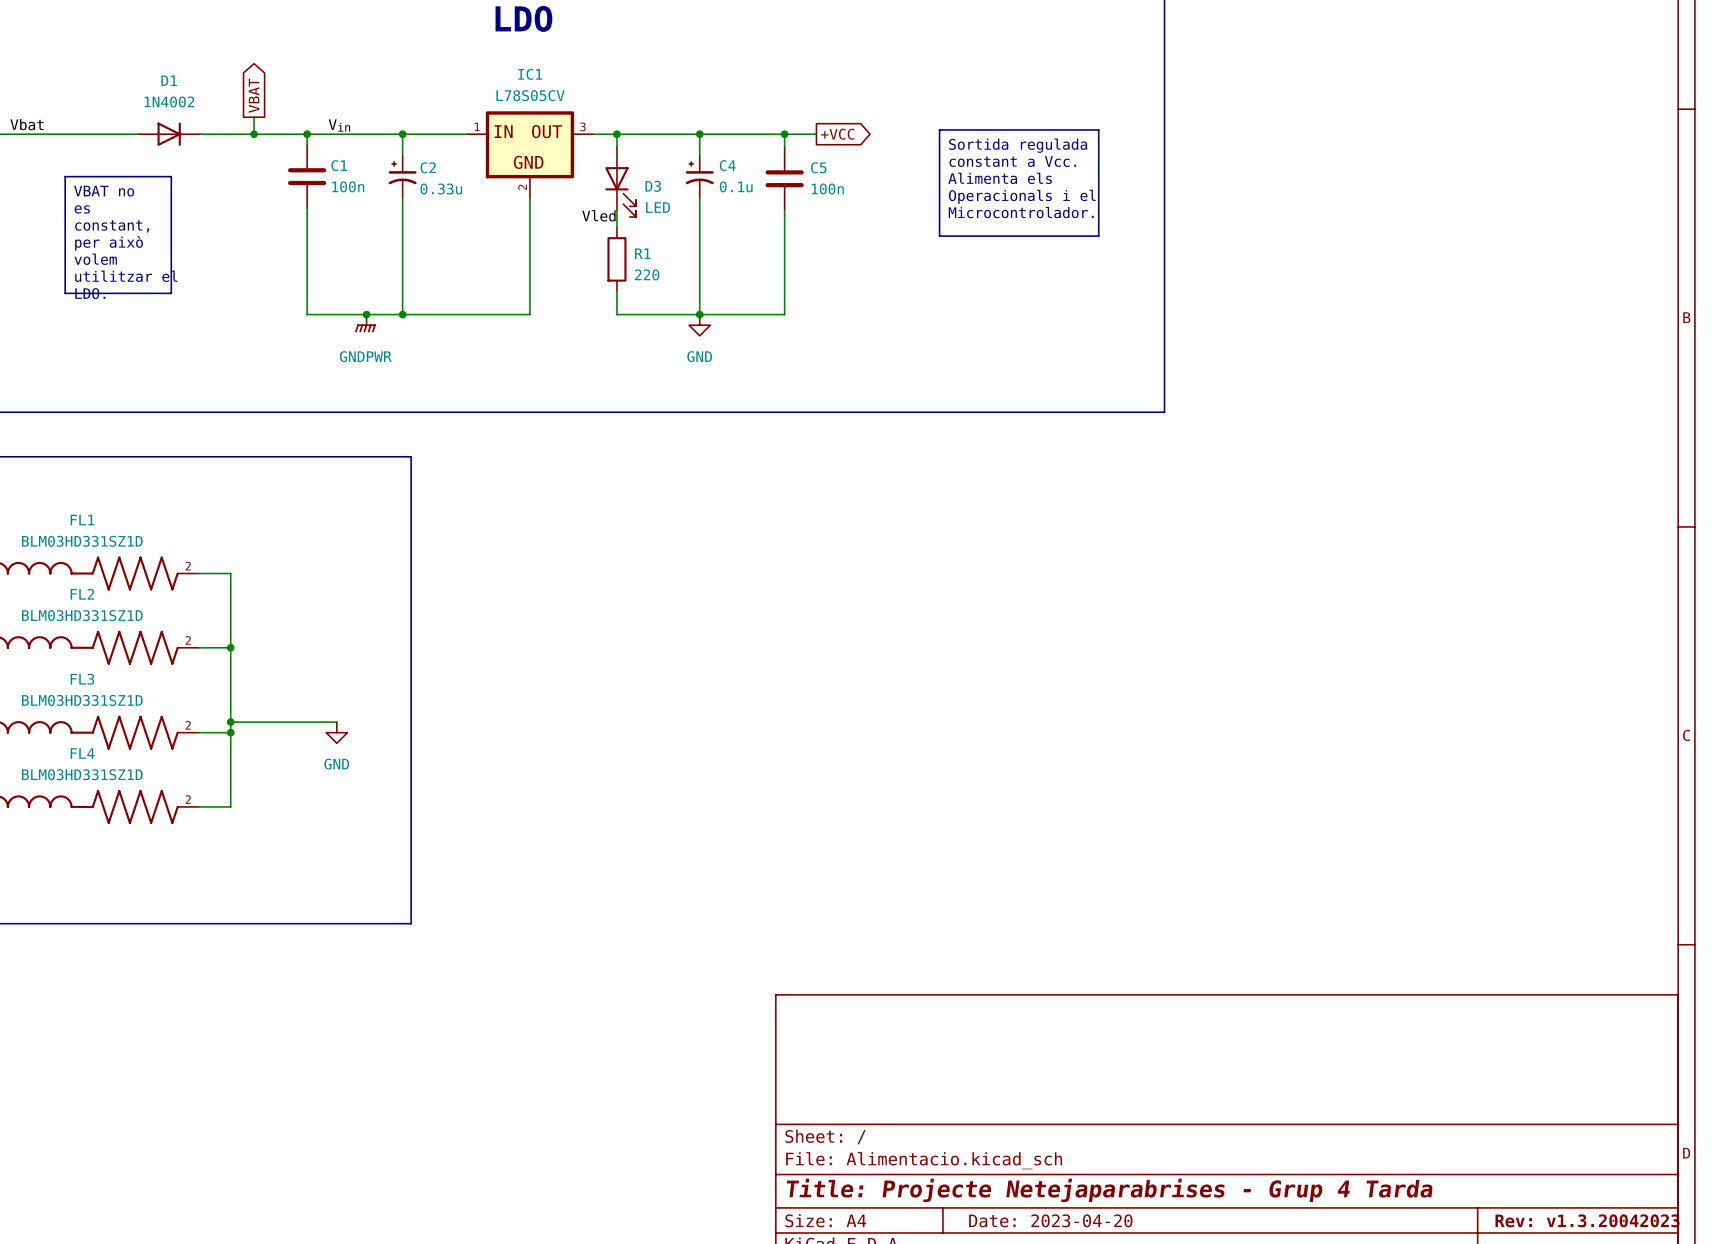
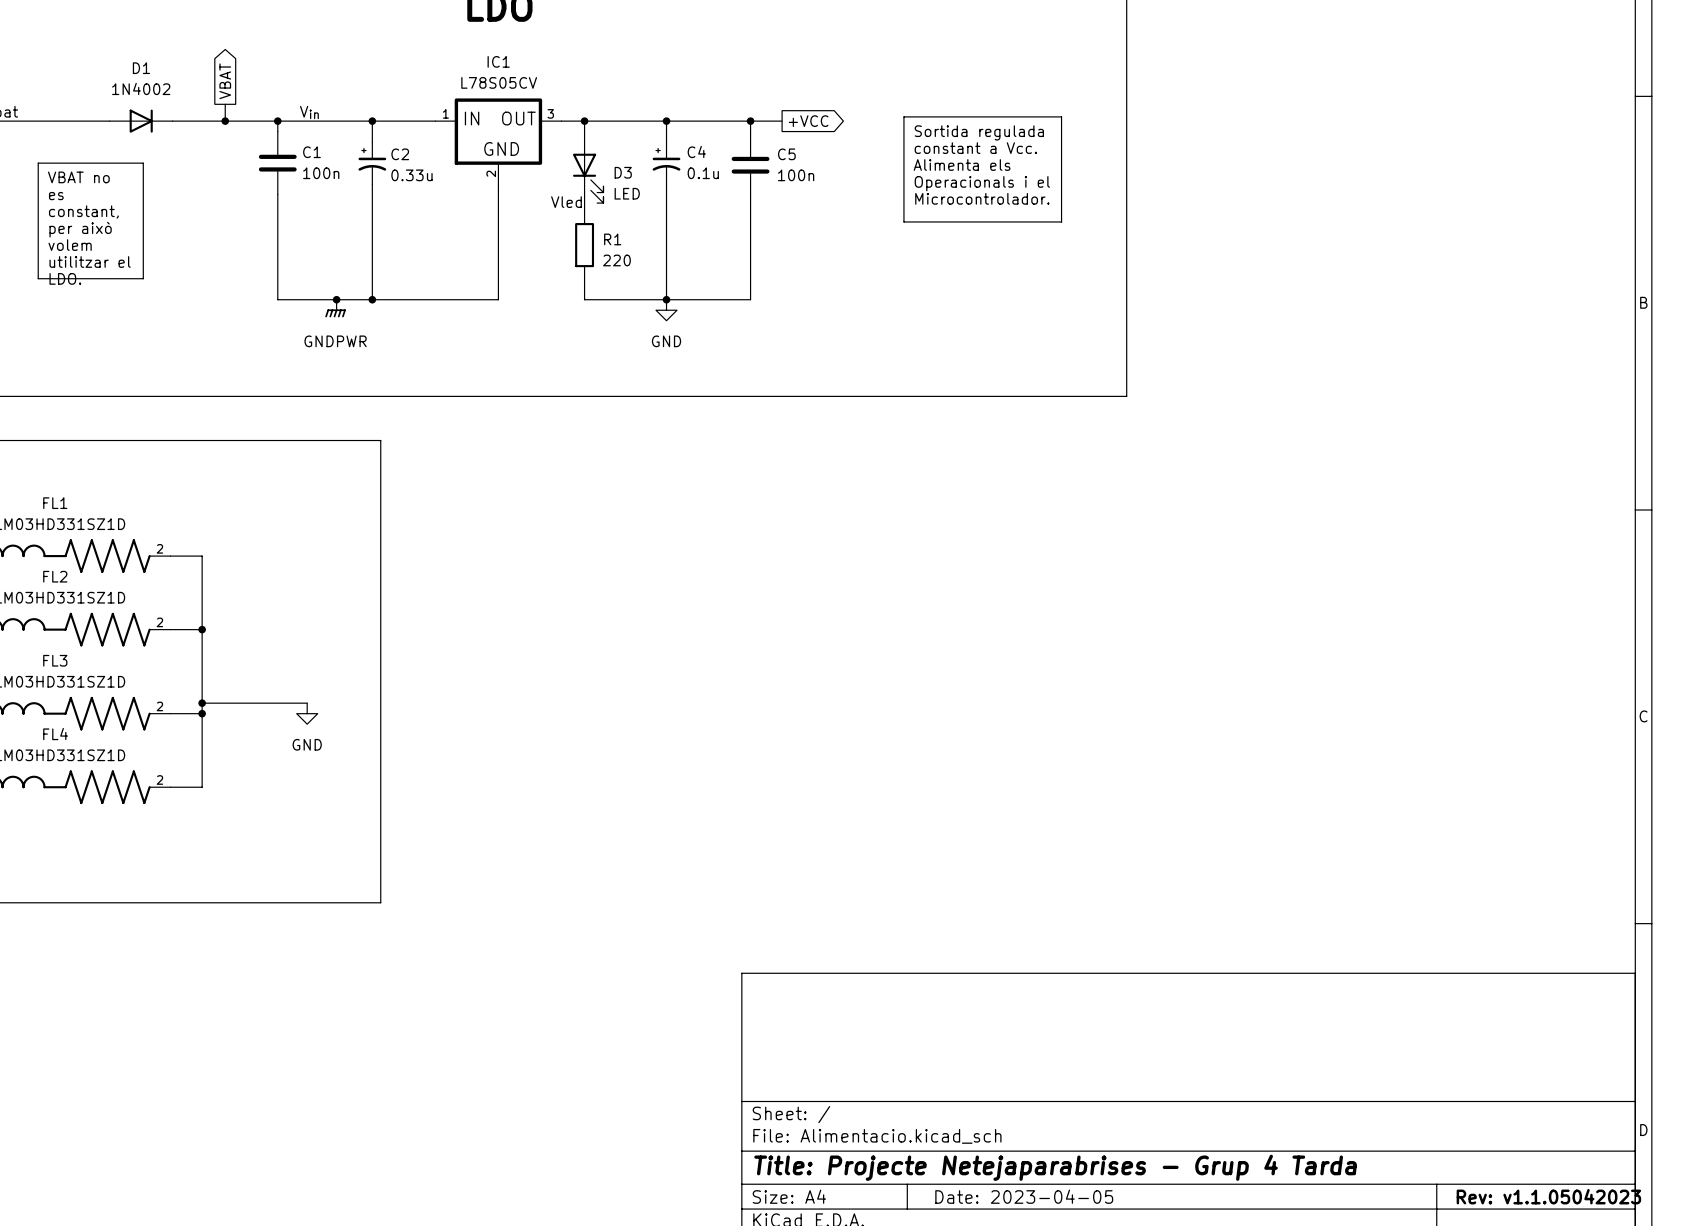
title block: Date: 2023-04-20 (1050, 1220) -> Date: 2023-04-05 (1024, 1196)
title block: Rev: v1.3.20042023 (1587, 1220) -> Rev: v1.1.05042023 (1548, 1196)

